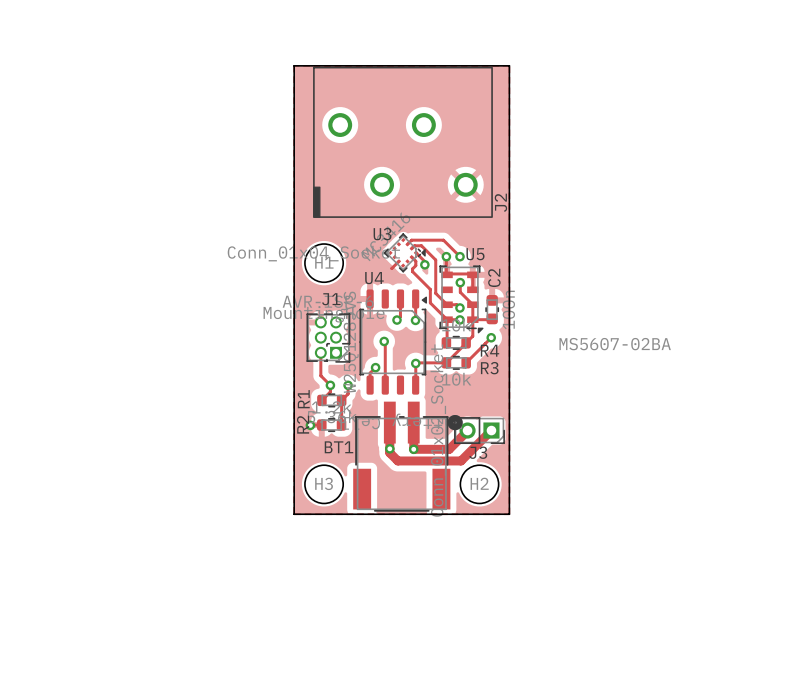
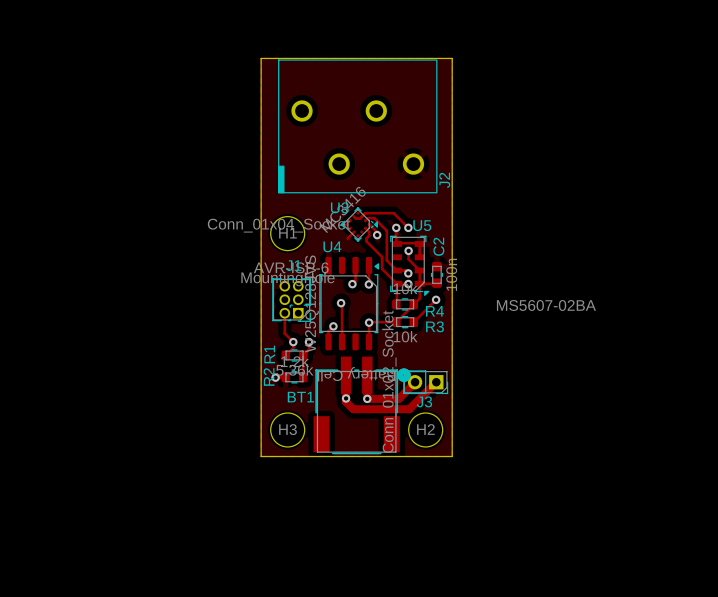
track: none -> (354, 216) (355, 218) (361, 216)

